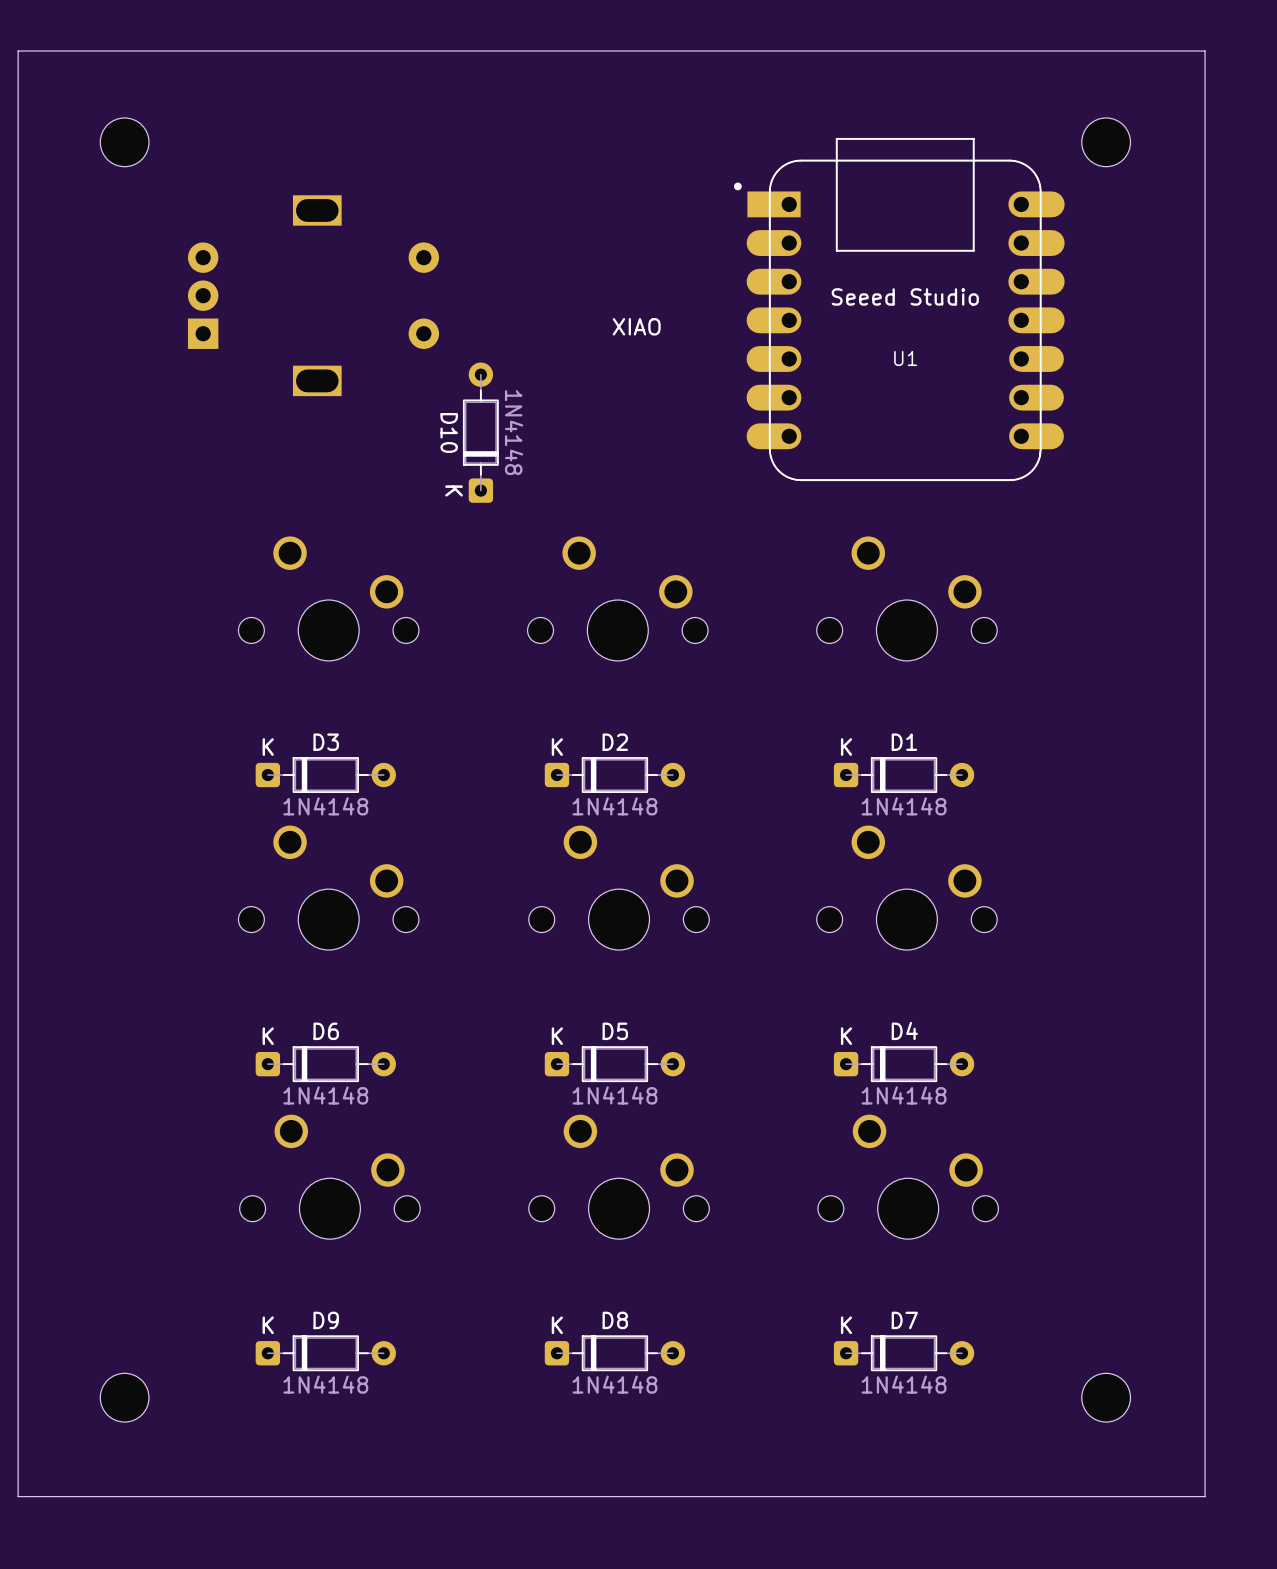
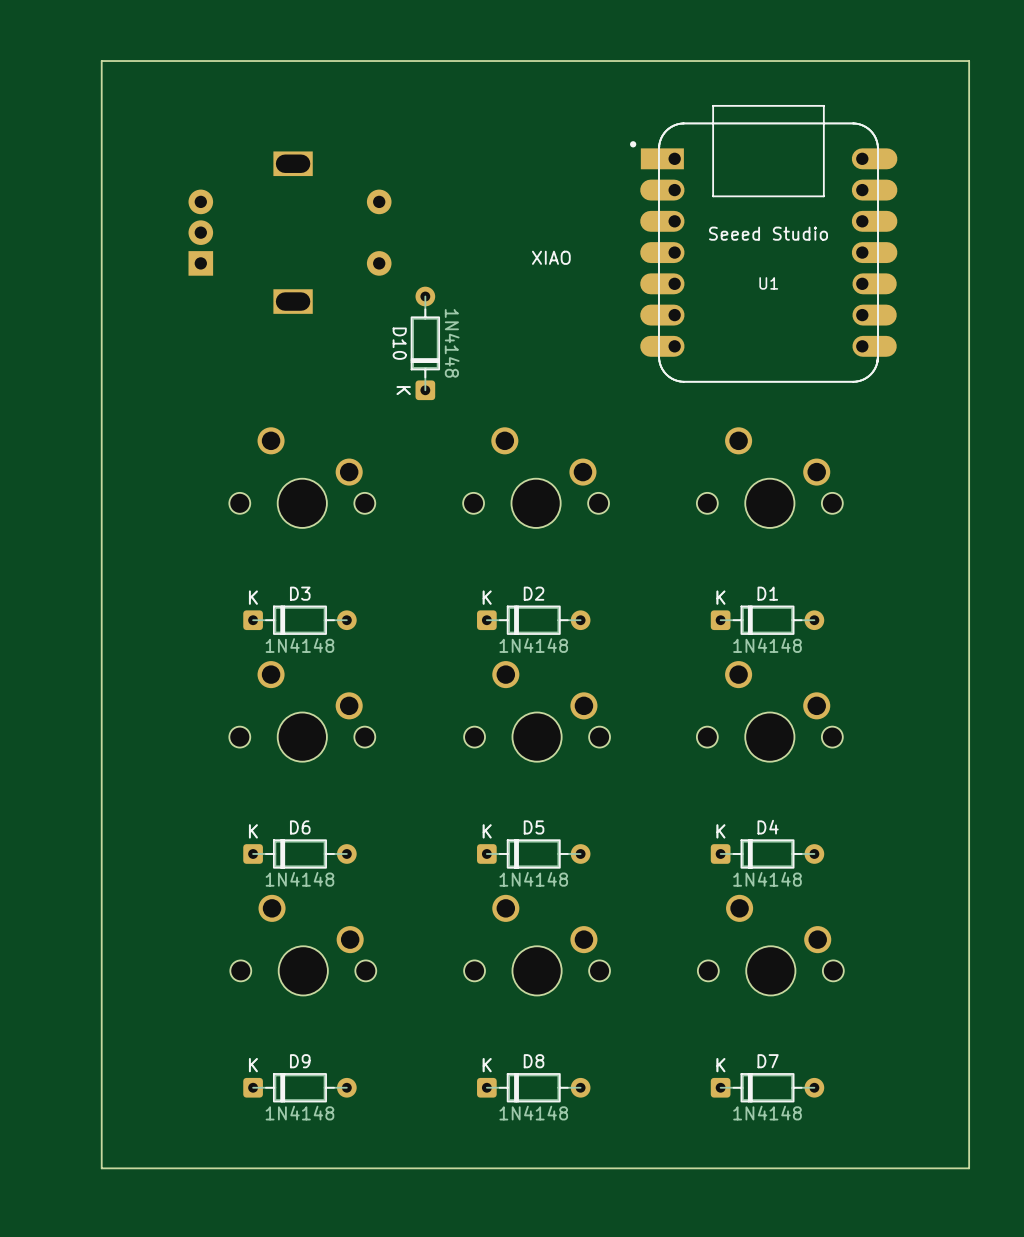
board edge: (1205, 51) (18, 51) (18, 1496) (1205, 1496) (1205, 51) -> (969, 61) (969, 1168) (101, 1168) (101, 61) (969, 61)
part: (124, 142) -> none
part: (1106, 142) -> none
part: (124, 1397) -> none
part: (1106, 1397) -> none

